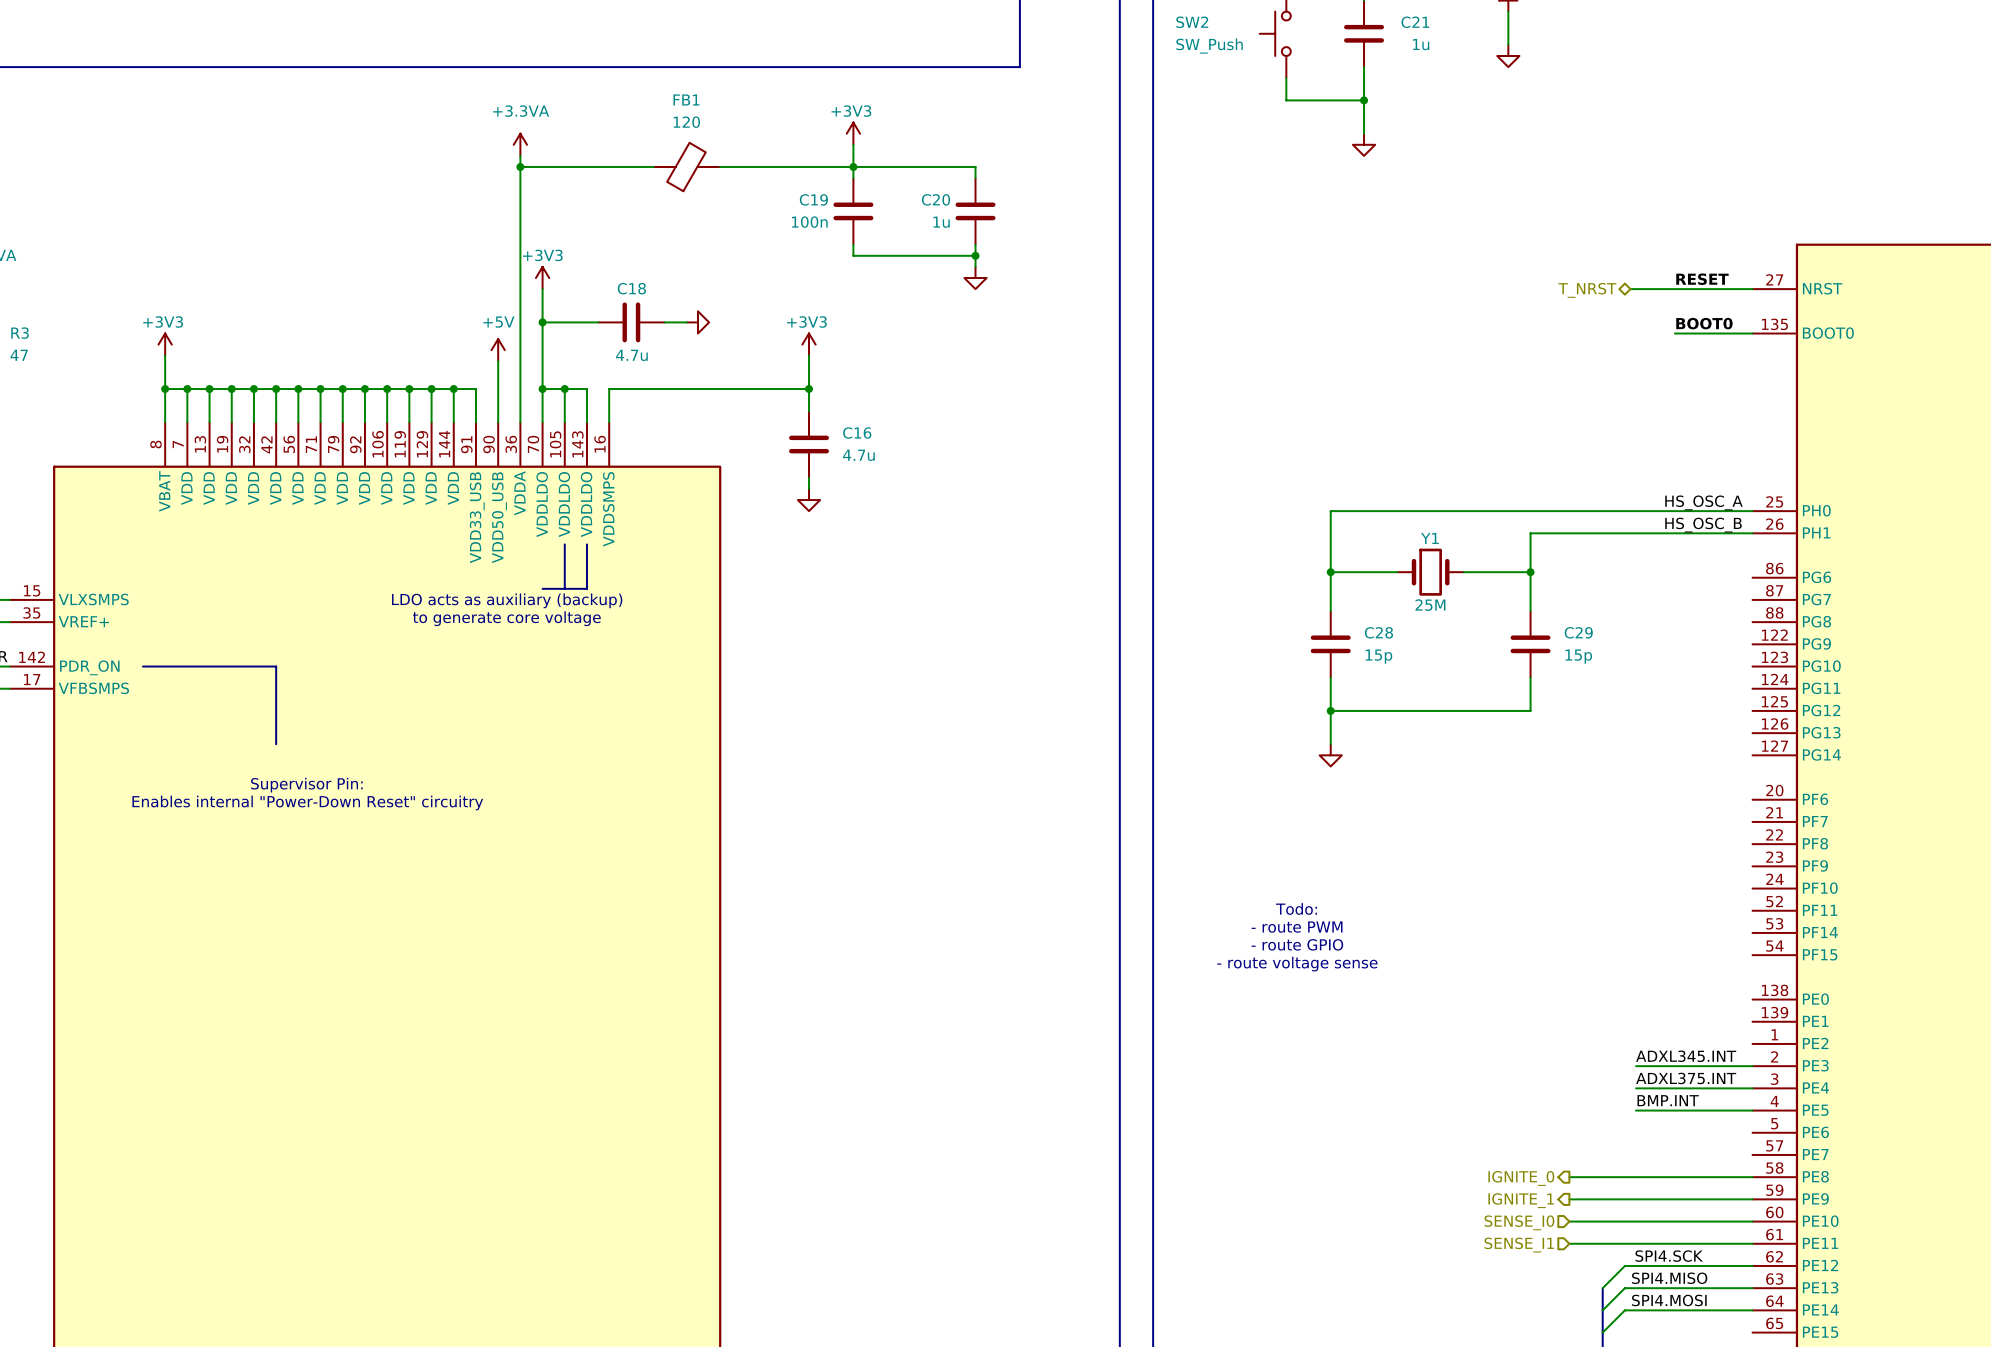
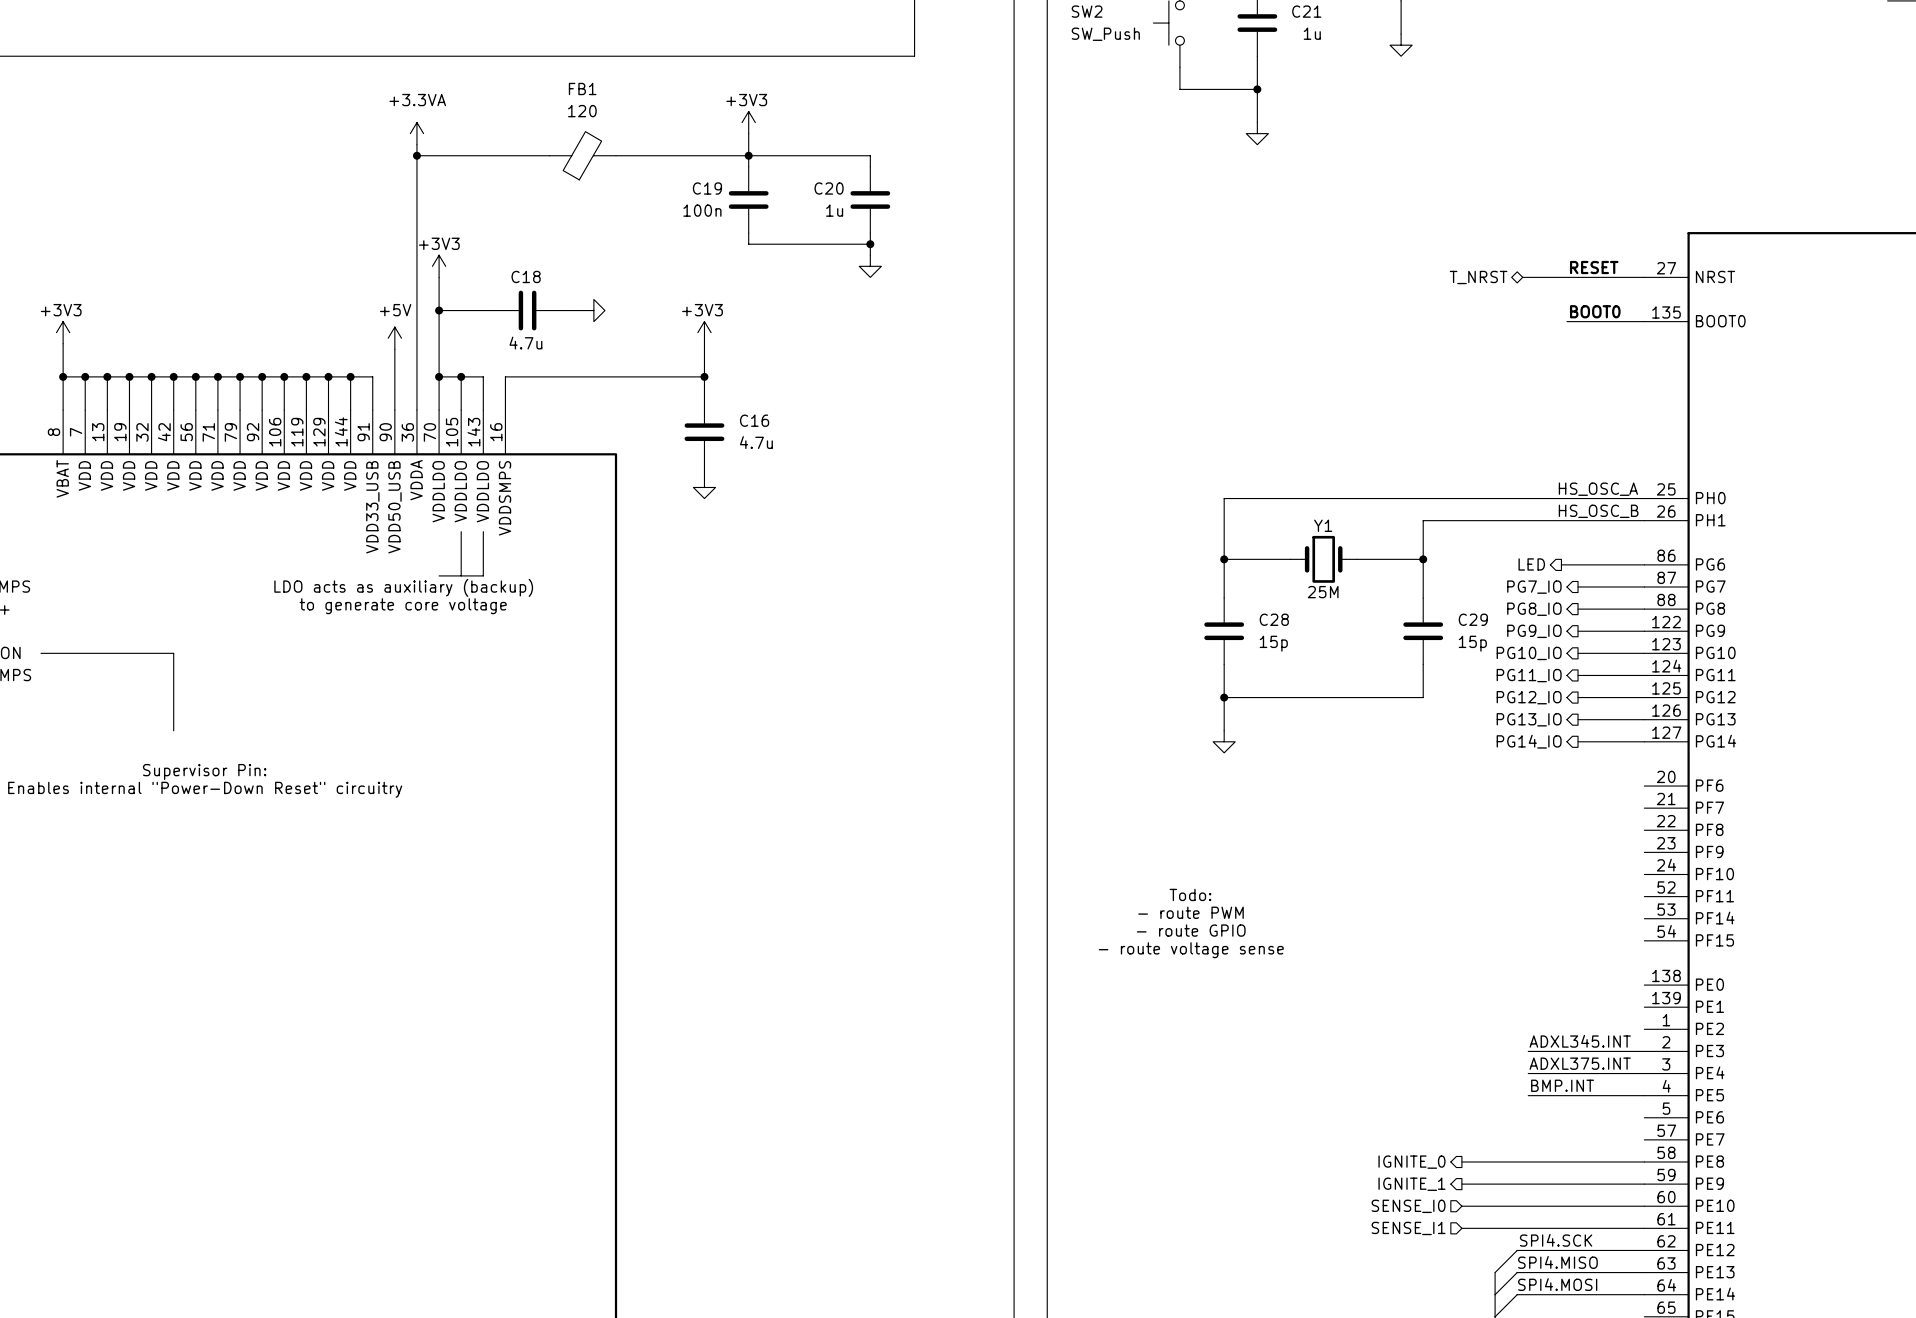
hierarchical label: none -> LED (1531, 564)
wire: none -> (1561, 564) (1644, 564)
wire: none -> (1578, 586) (1644, 586)
hierarchical label: none -> PG7_IO (1534, 587)
wire: none -> (1578, 609) (1644, 609)
hierarchical label: none -> PG8_IO (1534, 609)
wire: none -> (1578, 631) (1644, 631)
hierarchical label: none -> PG9_IO (1534, 631)
wire: none -> (1578, 653) (1644, 653)
hierarchical label: none -> PG10_IO (1529, 653)
wire: none -> (1578, 675) (1644, 675)
hierarchical label: none -> PG11_IO (1529, 675)
wire: none -> (1578, 697) (1644, 697)
hierarchical label: none -> PG12_IO (1529, 697)
wire: none -> (1578, 719) (1644, 719)
hierarchical label: none -> PG13_IO (1529, 719)
wire: none -> (1578, 741) (1644, 741)
hierarchical label: none -> PG14_IO (1529, 741)

